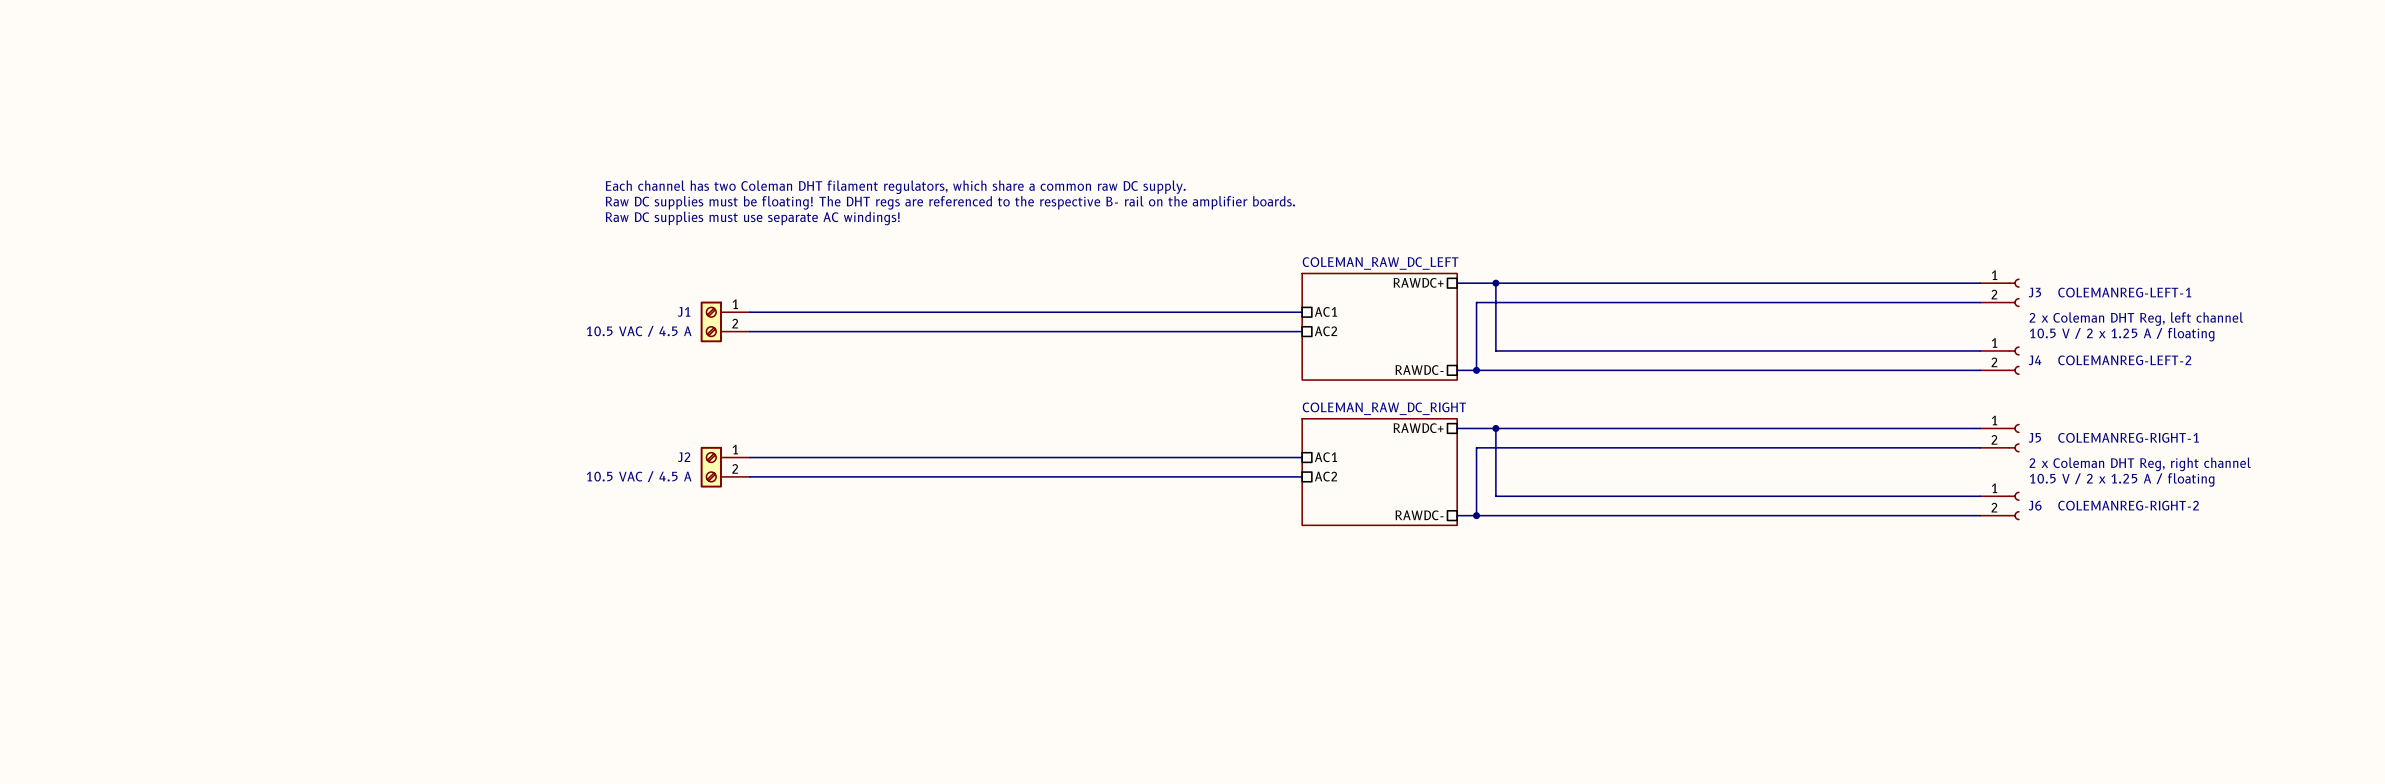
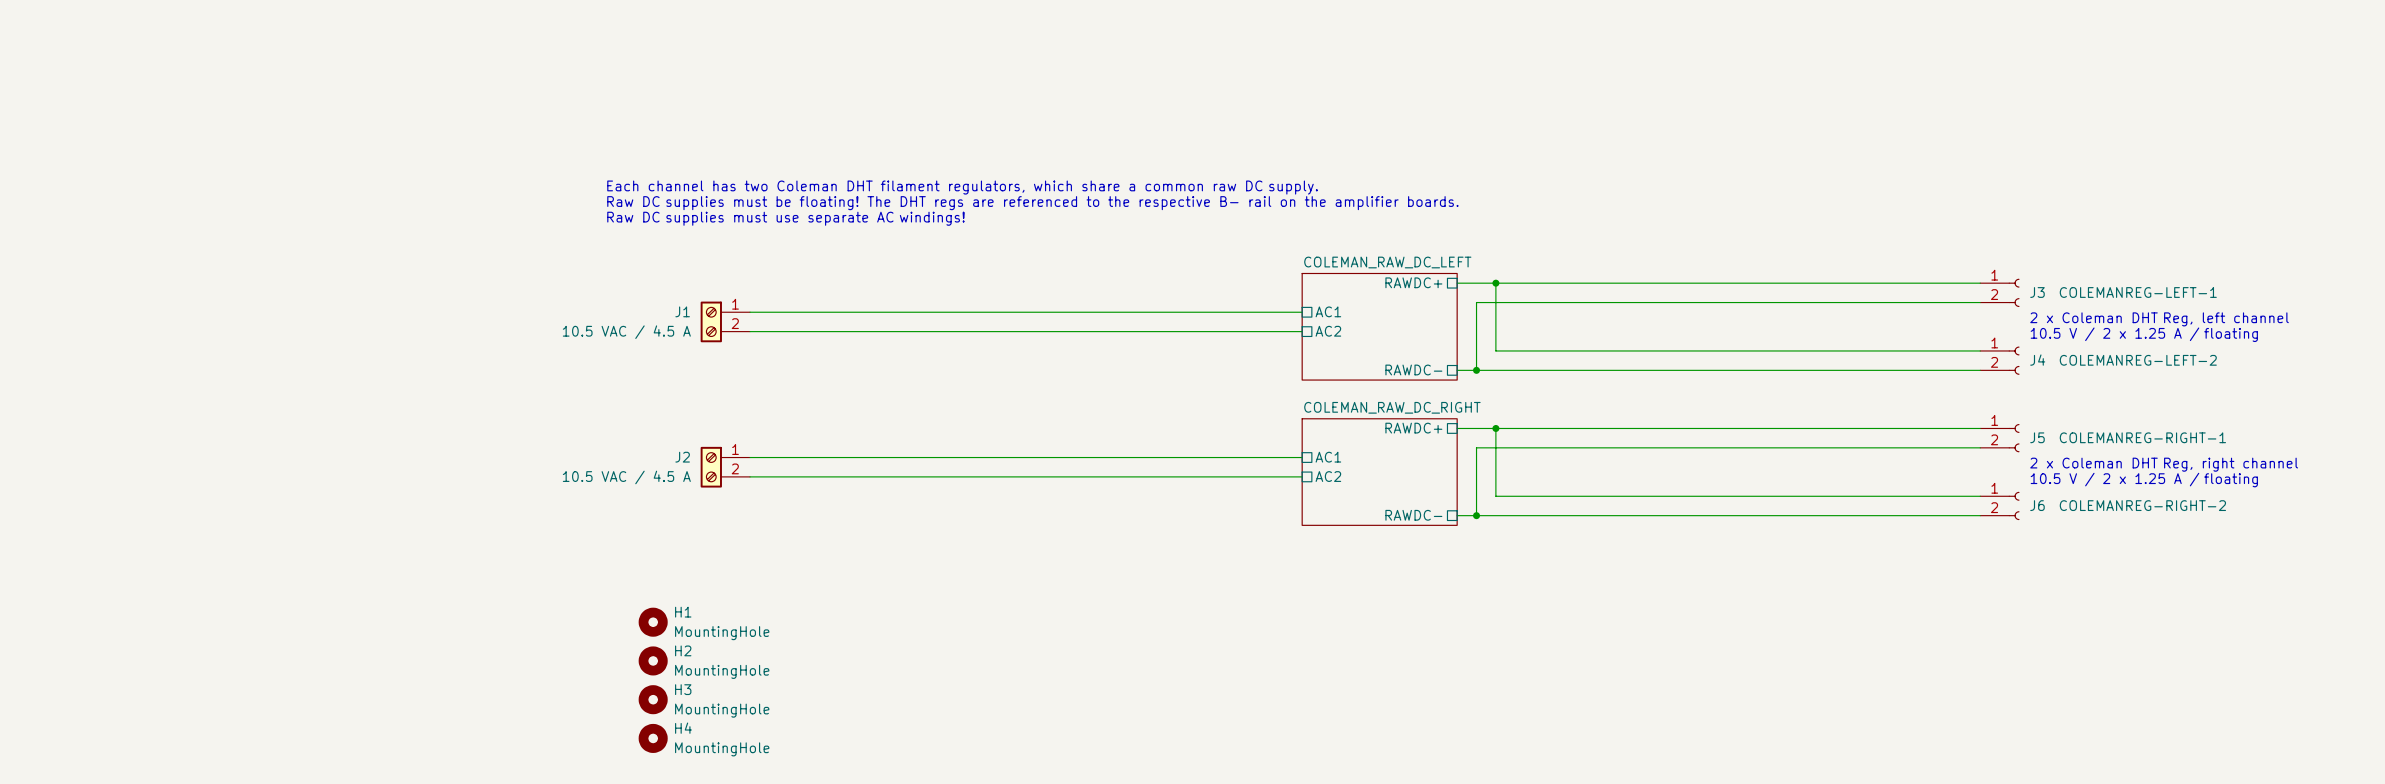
H1: none -> MountingHole (653, 622)
H2: none -> MountingHole (653, 660)
H3: none -> MountingHole (653, 699)
H4: none -> MountingHole (653, 738)

